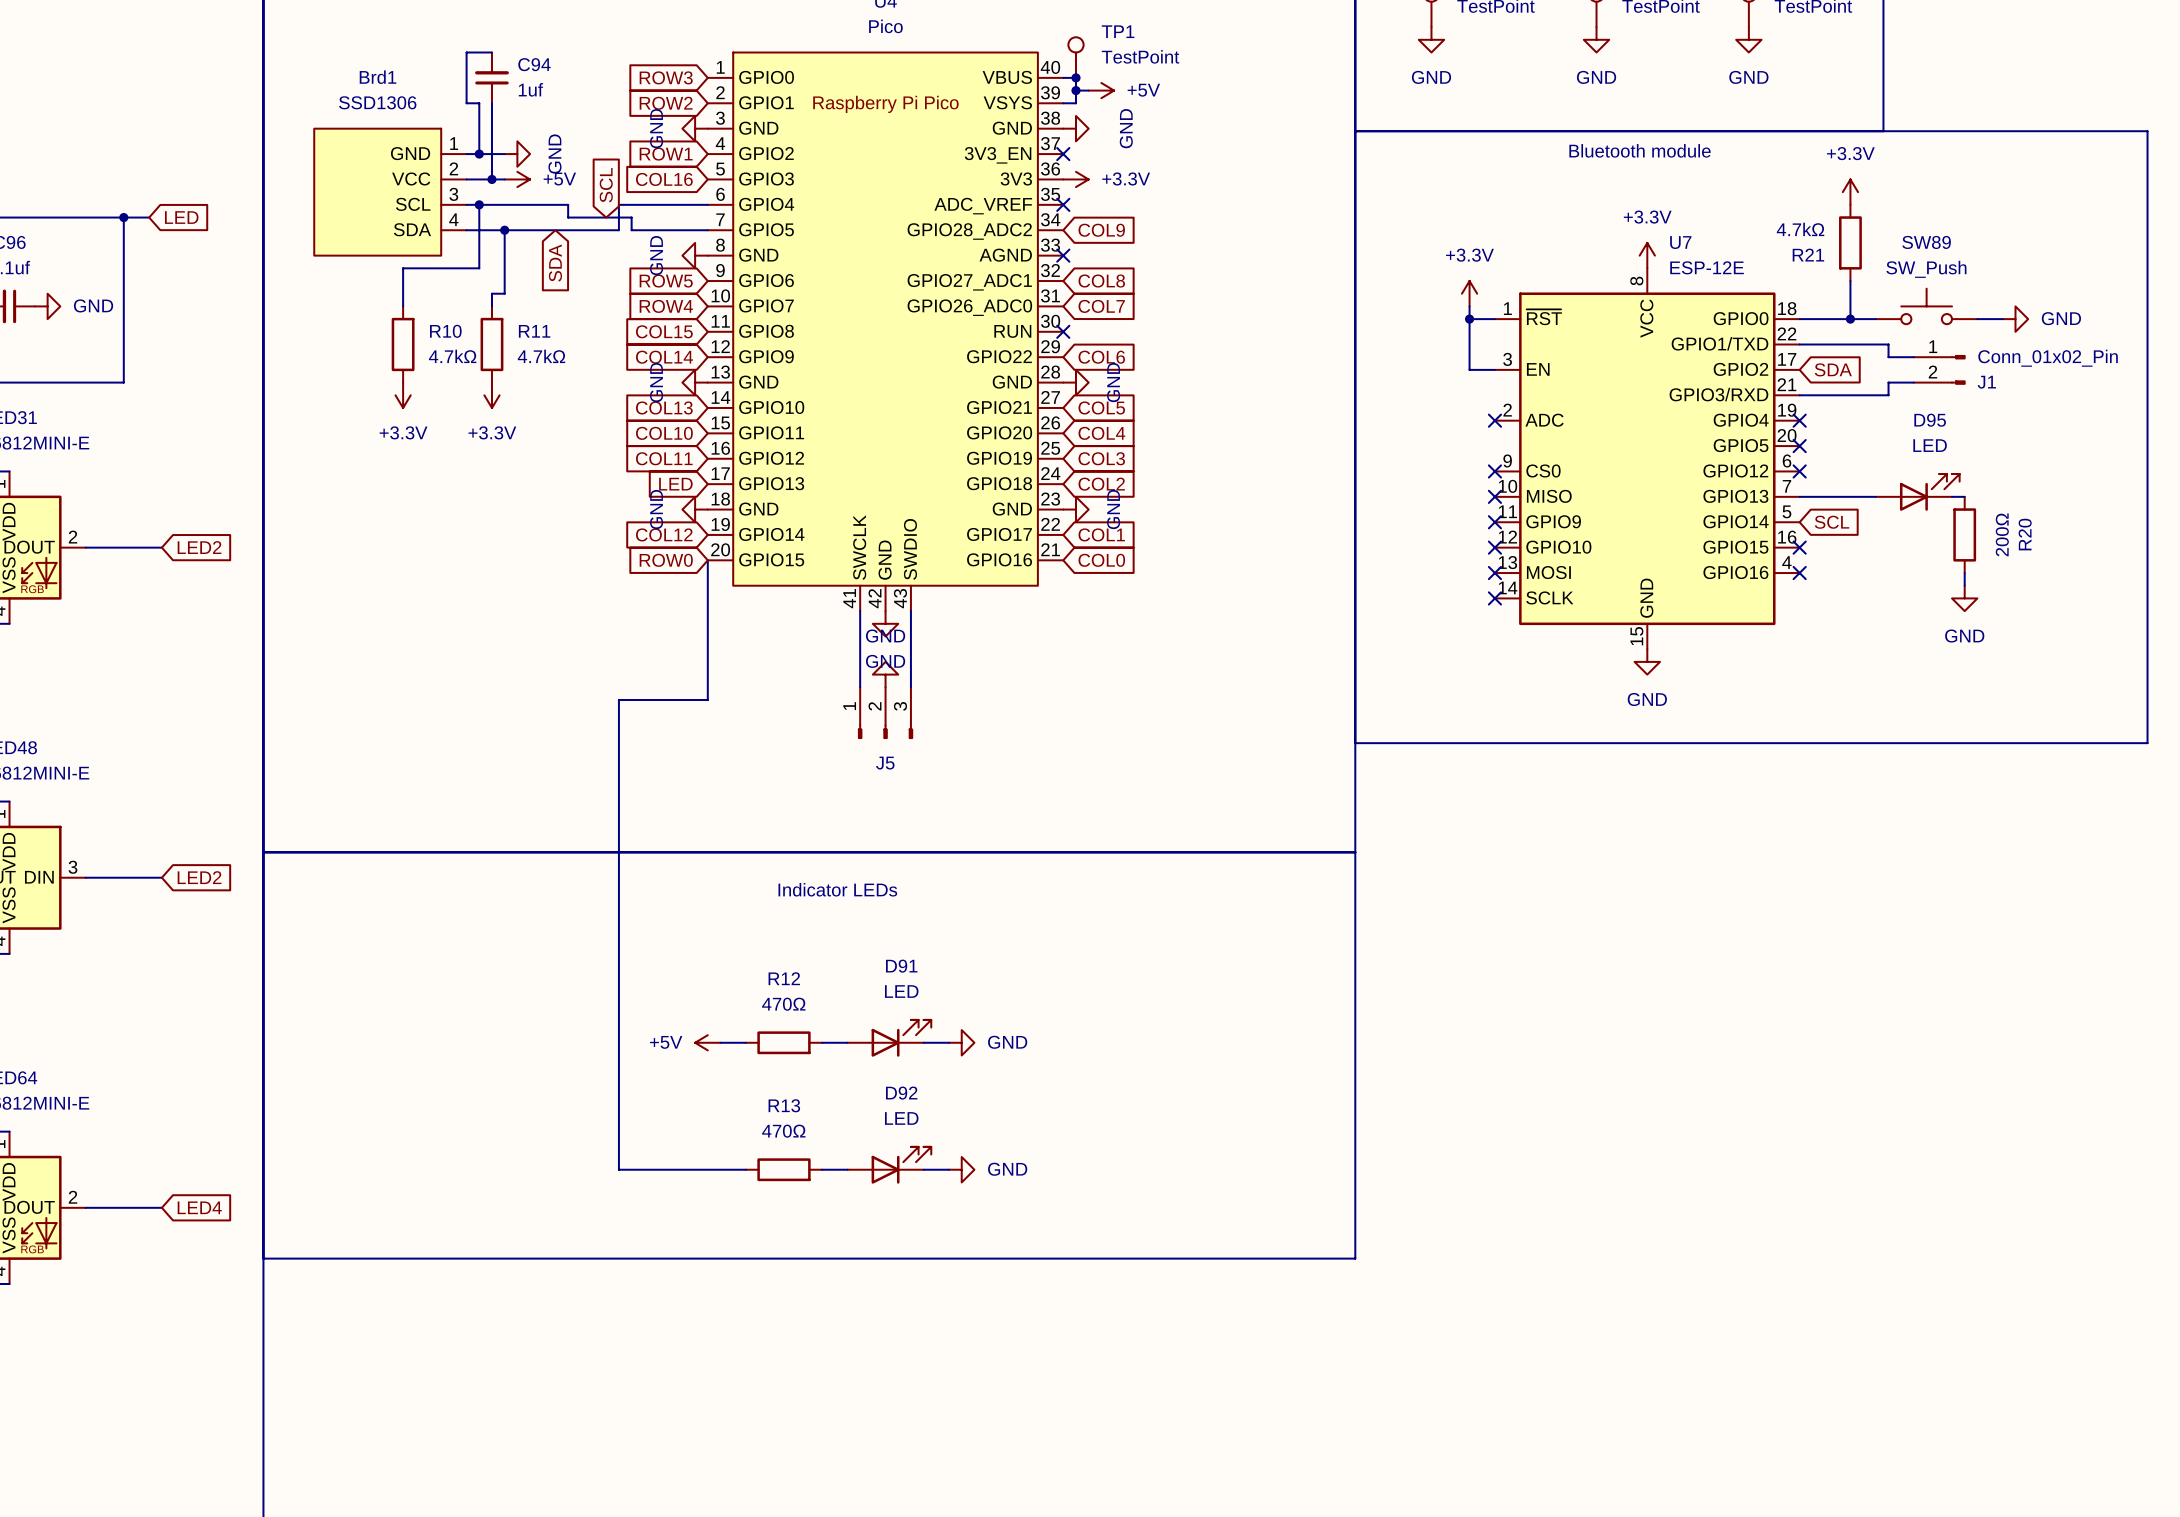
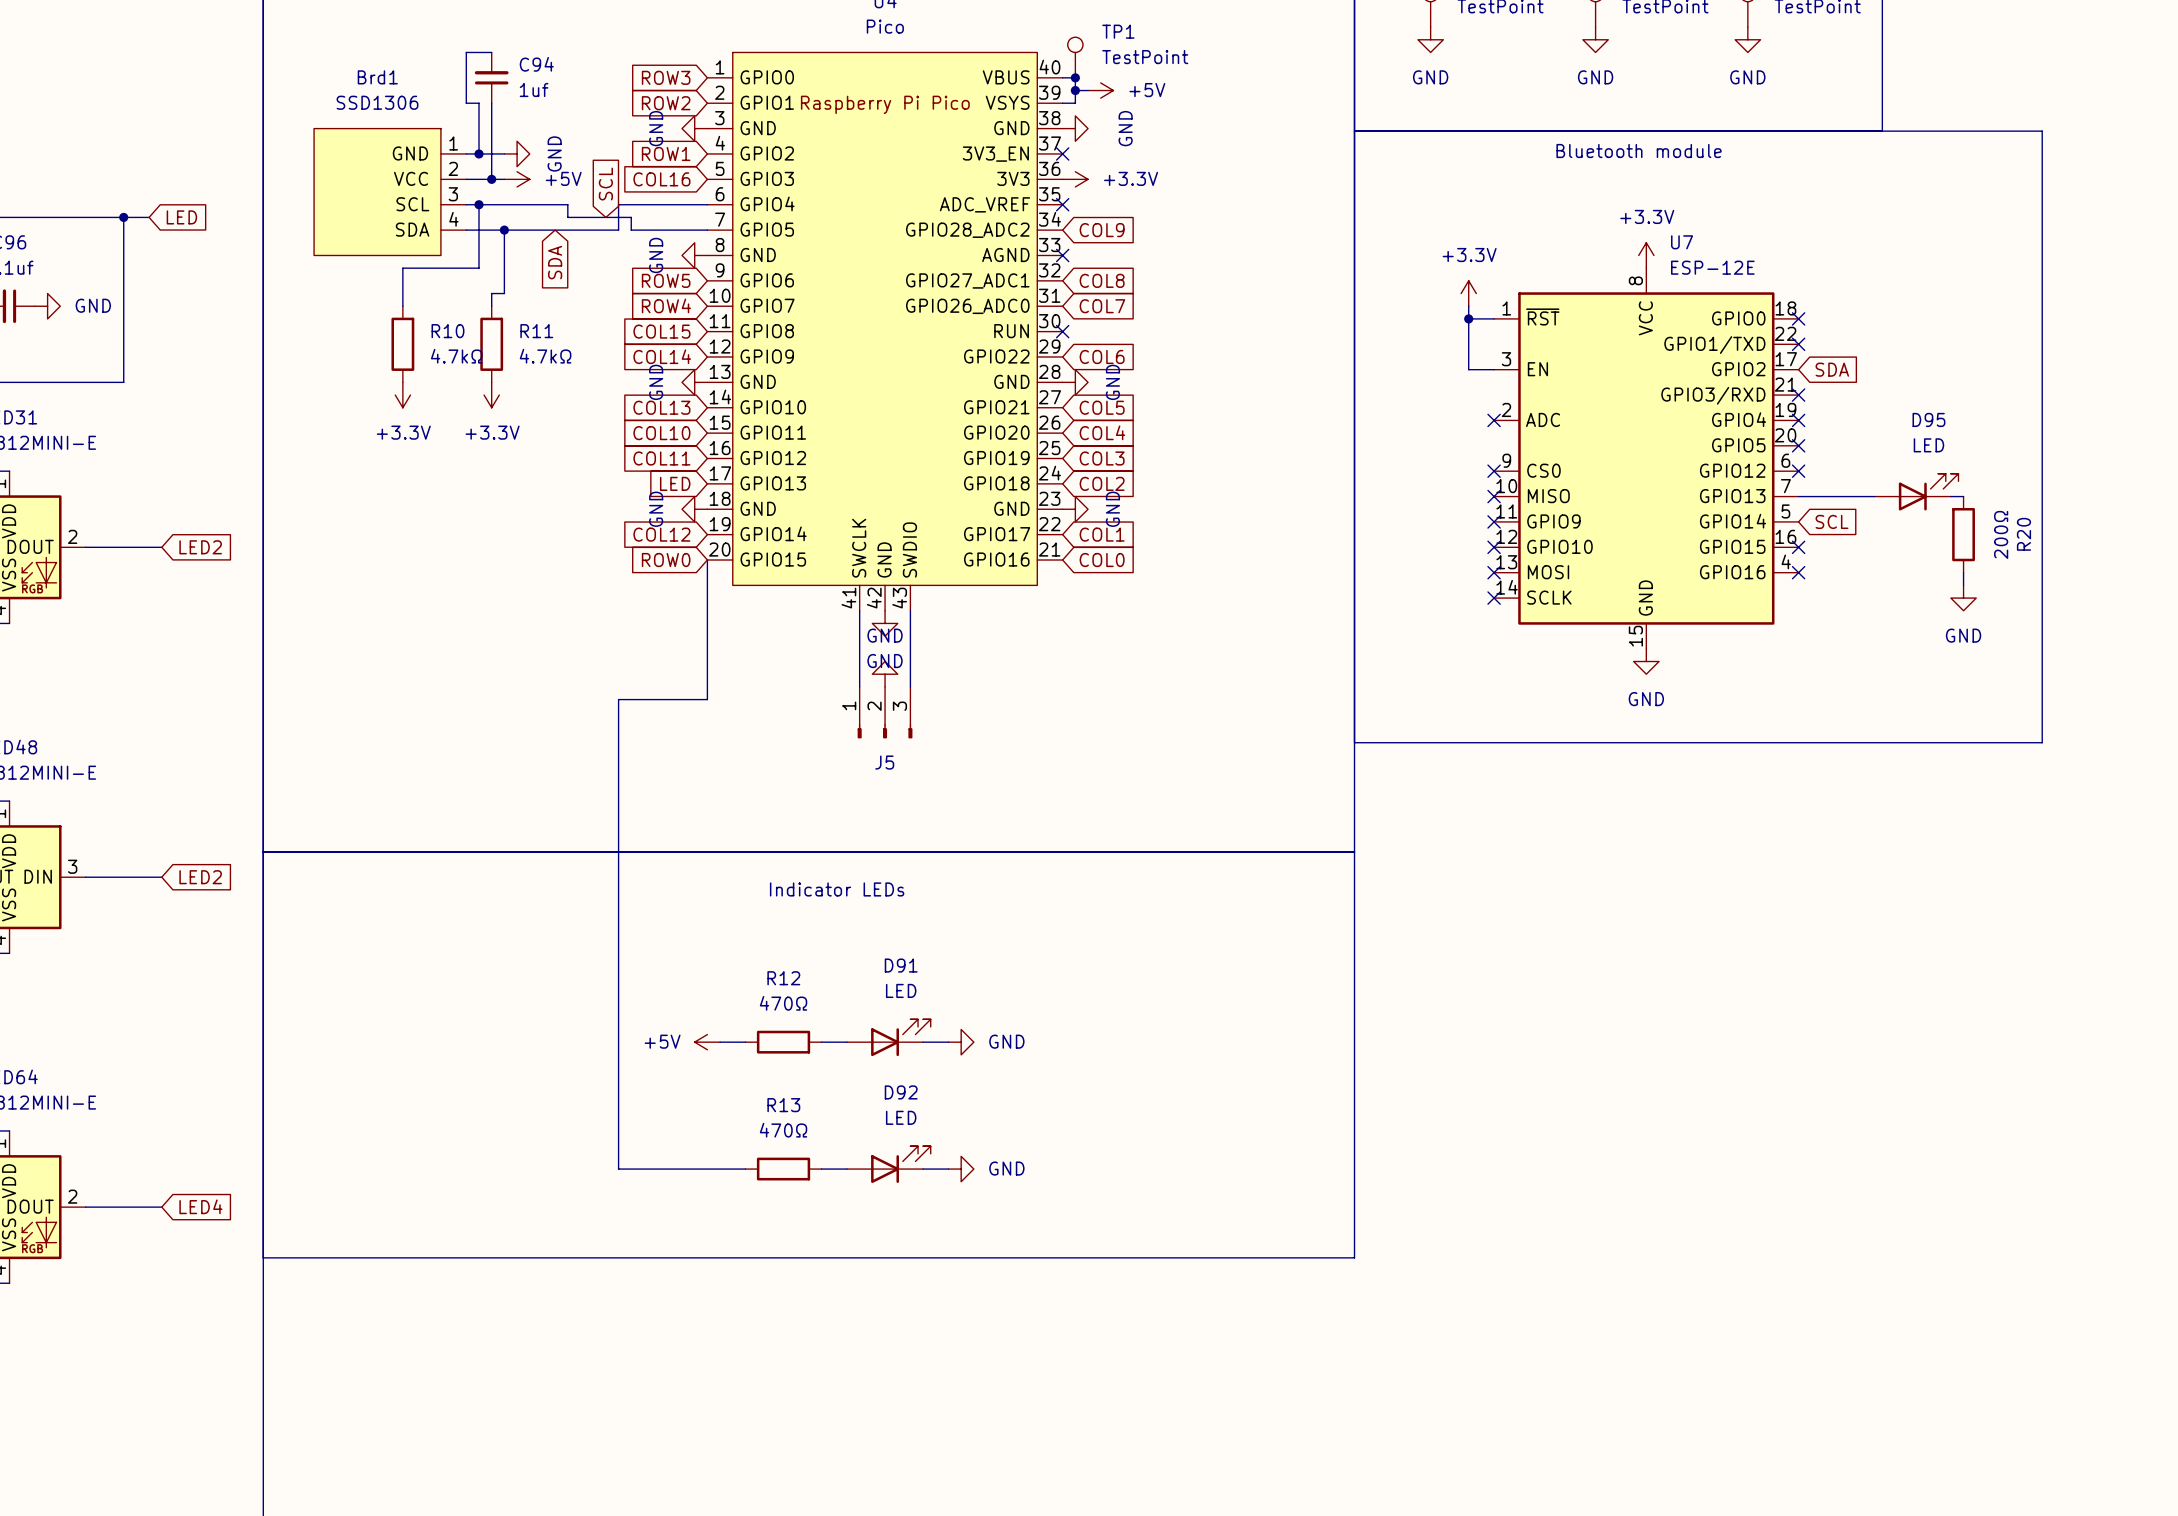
line: (2043, 131) (2147, 131) (2147, 743) (2043, 743) -> (2042, 131) (2042, 742)
power symbol: +3.3V (1850, 192) -> none
R21: 4.7kΩ (1850, 242) -> none
wire: (1850, 281) (1850, 319) -> none
SW89: SW_Push (1926, 306) -> none
wire: (1799, 319) (1875, 319) -> none
no-connect mark: none -> (1798, 318)
junction: (1850, 319) -> none
wire: (1977, 319) (2002, 319) -> none
power symbol: GND (2015, 319) -> none
wire: (1799, 344) (1888, 344) (1888, 357) (1913, 357) -> none
no-connect mark: none -> (1798, 344)
J1: Conn_01x02_Pin (1939, 369) -> none
wire: (1913, 382) (1888, 382) (1888, 395) (1799, 395) -> none
no-connect mark: none -> (1798, 395)

